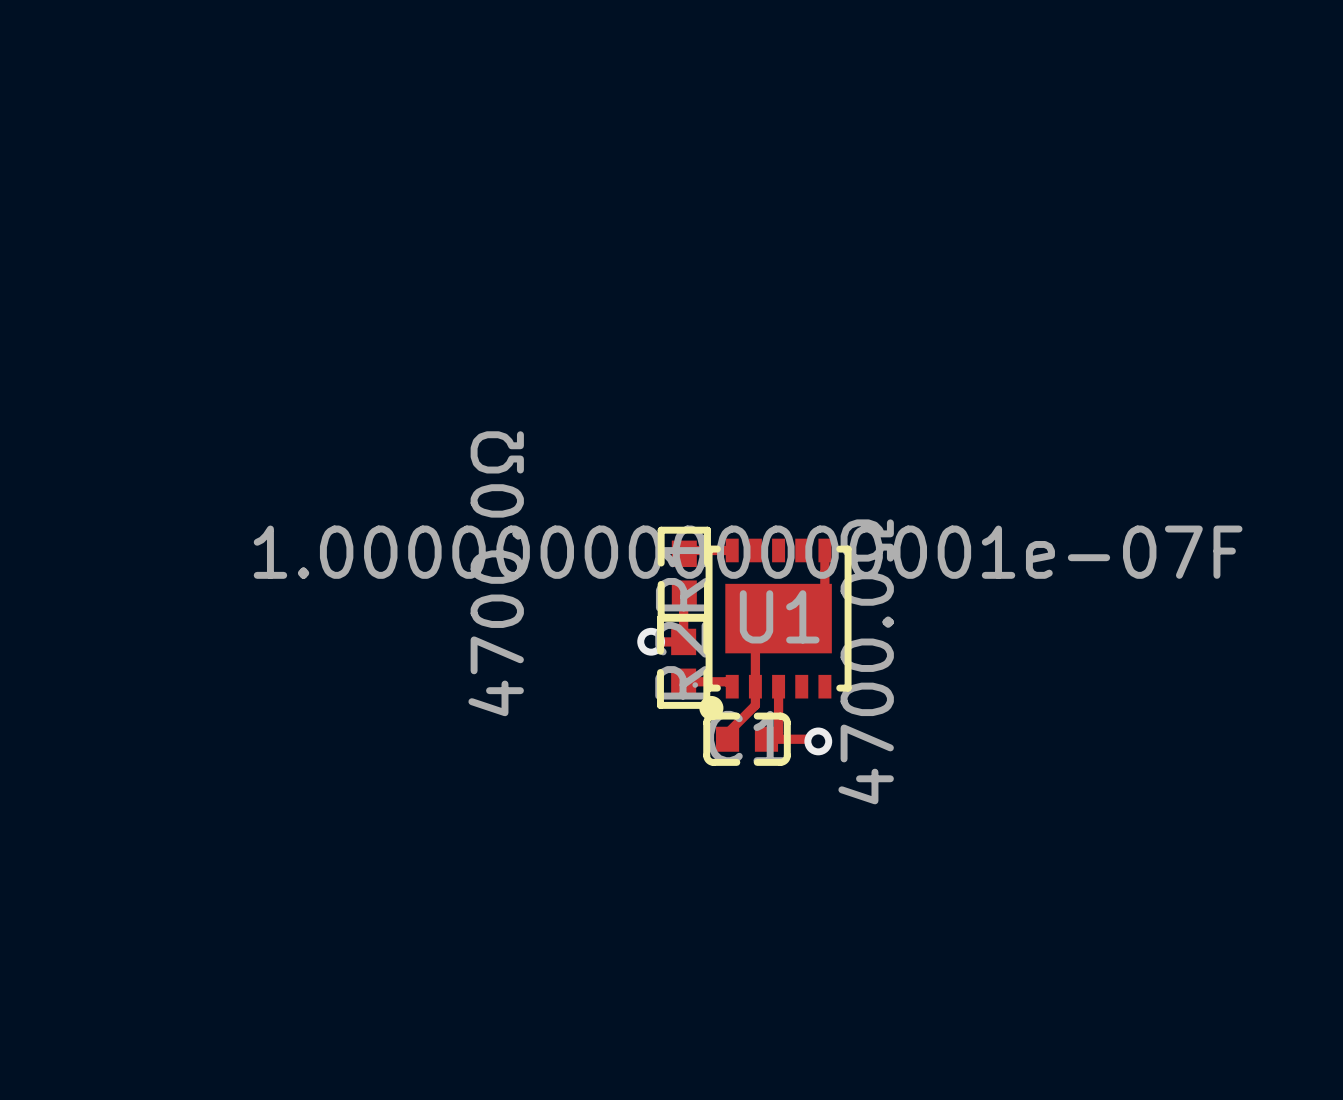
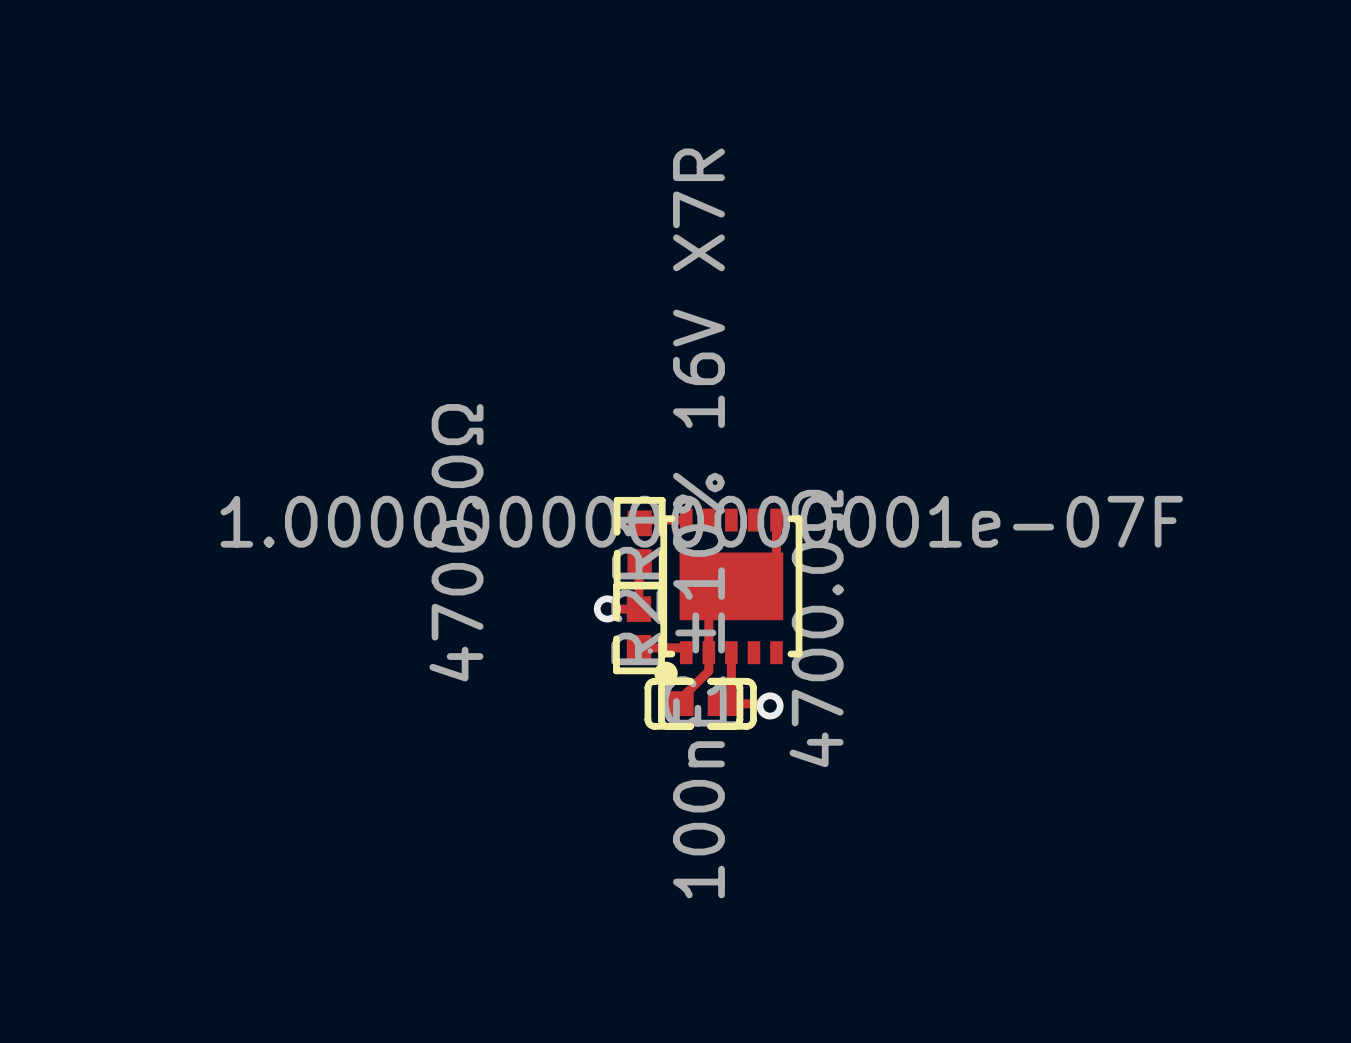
U1 name: U1 (779, 616) -> none
part: none -> 100nF ±10% 16V X7R (700, 703)

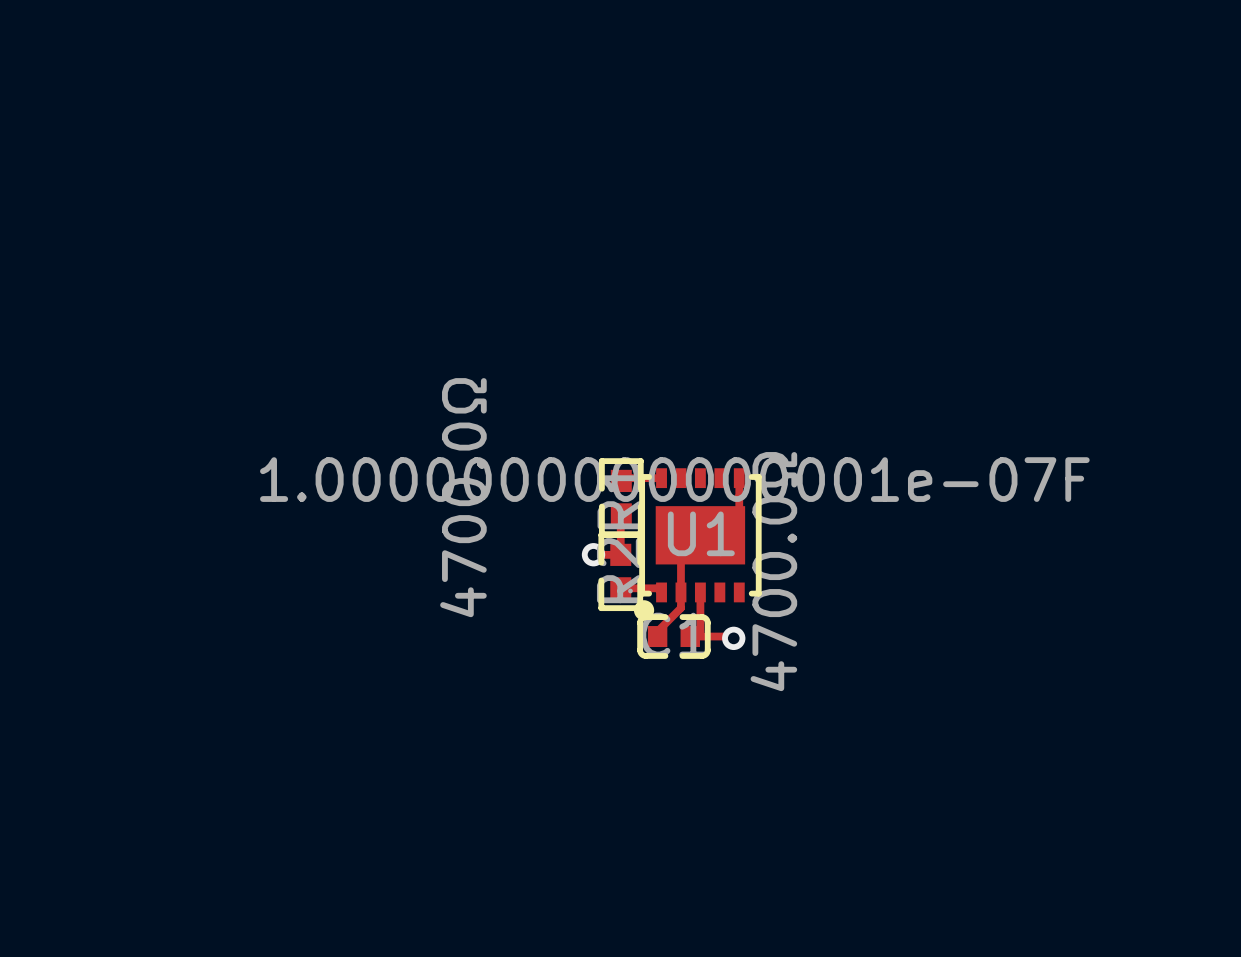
U1 name: none -> U1 (701, 533)
part: 100nF ±10% 16V X7R (700, 703) -> none

